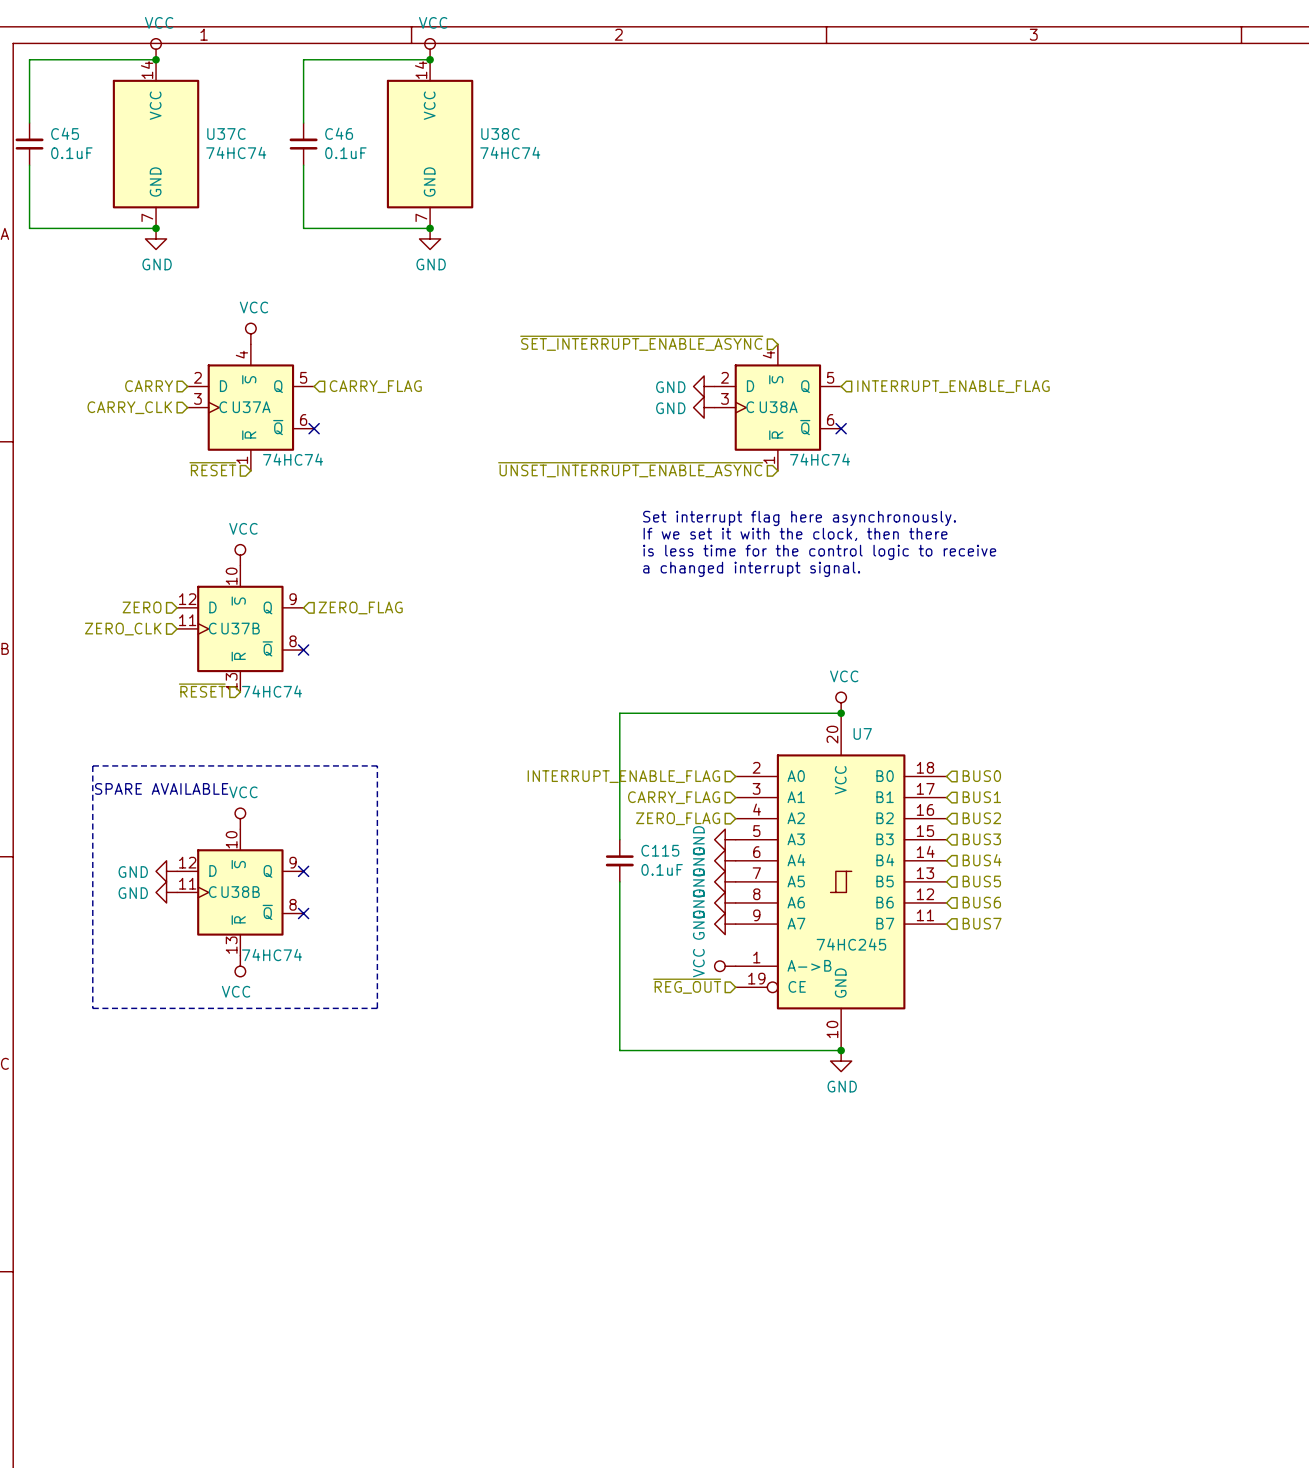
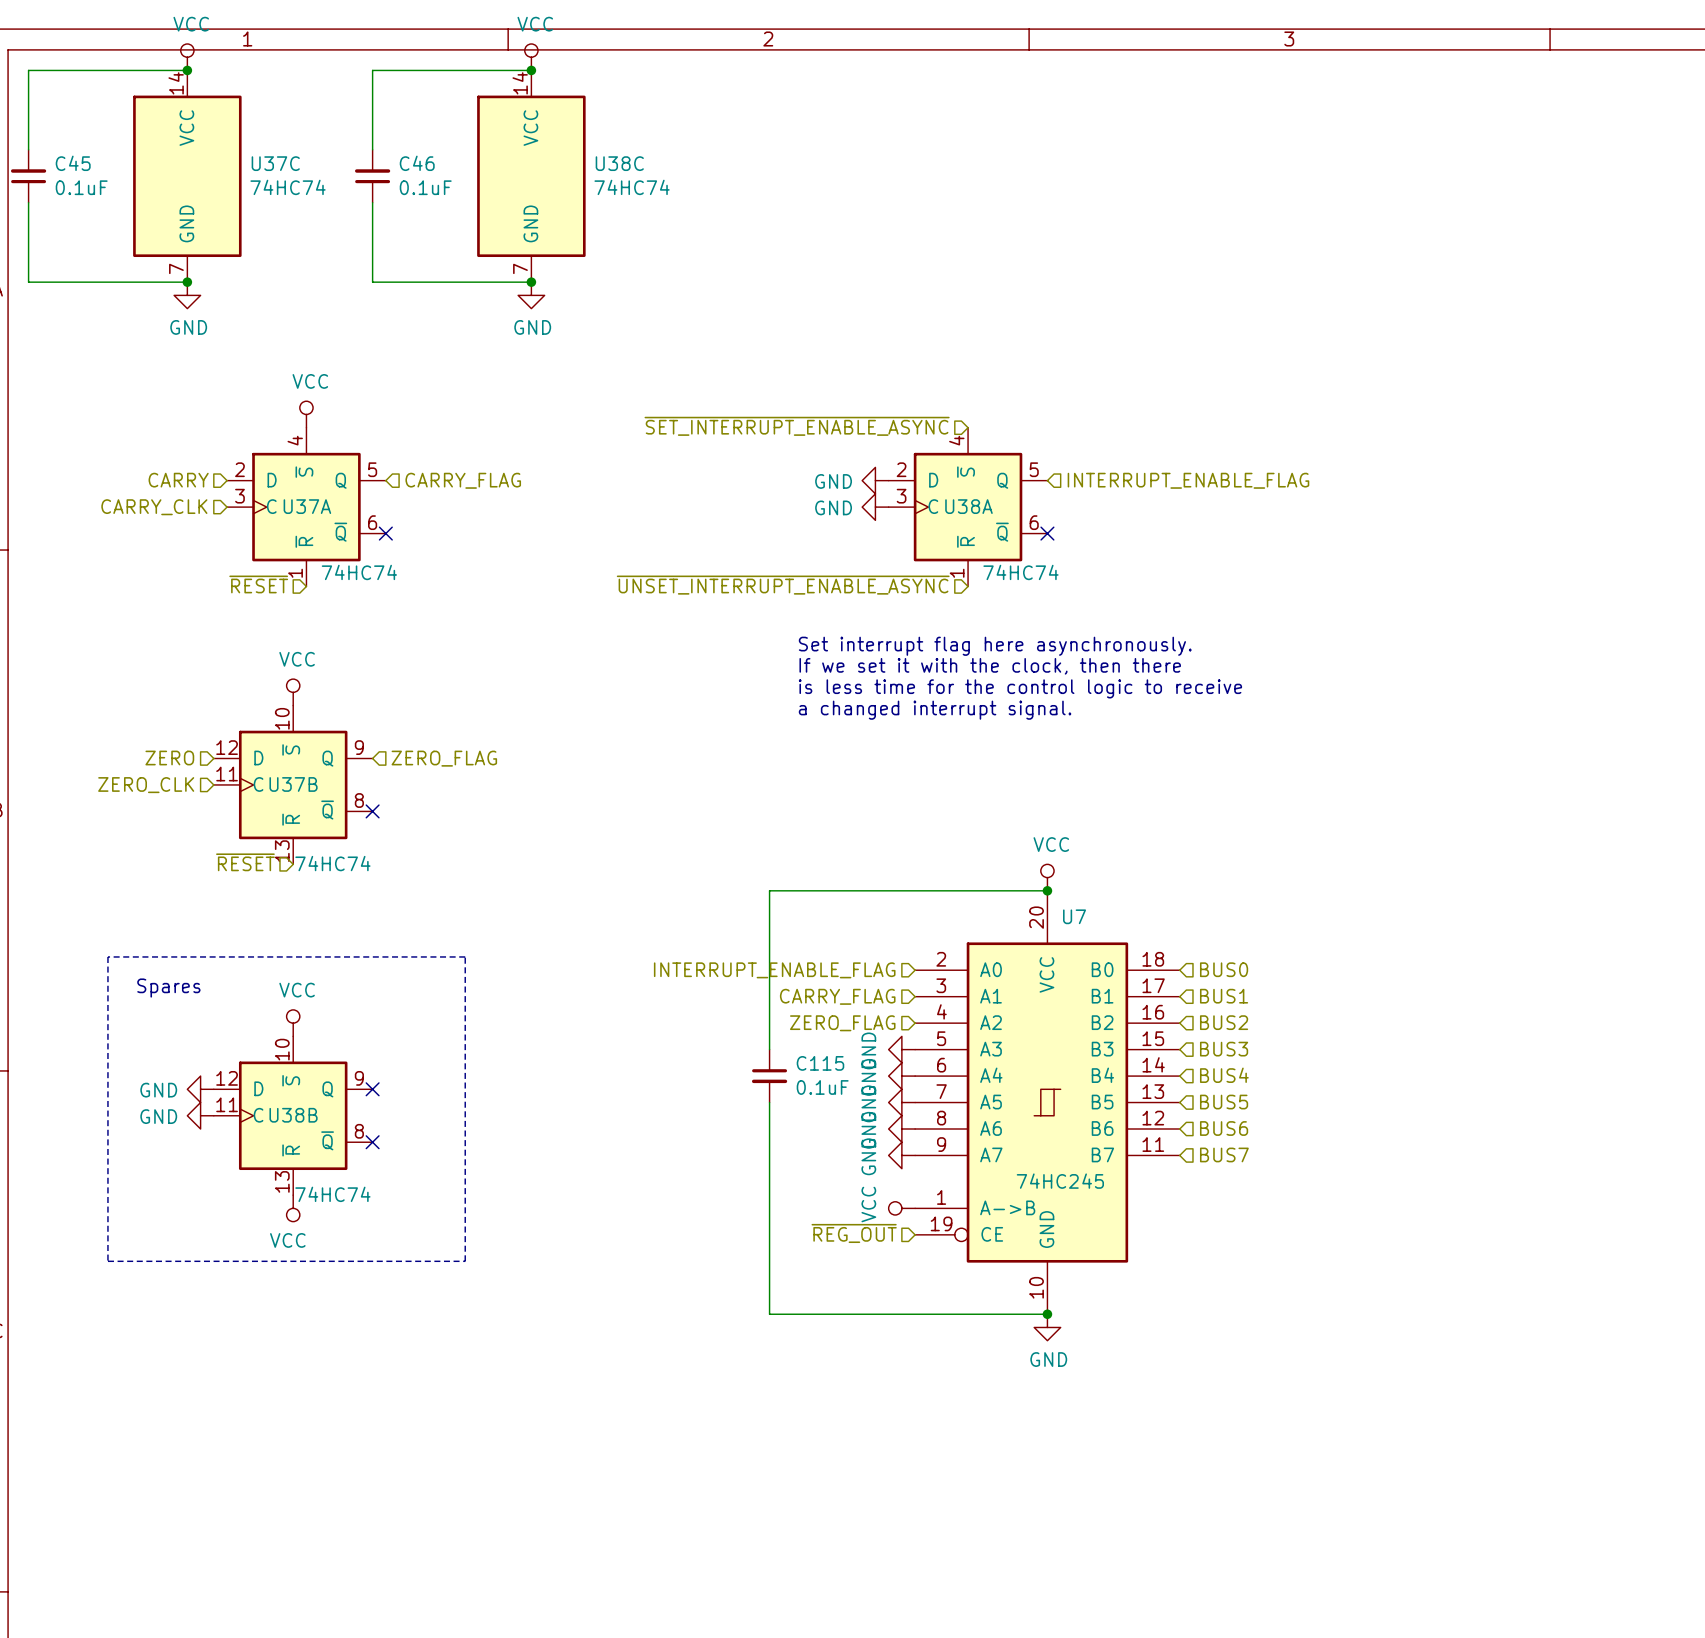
text: SPARE AVAILABLE (161, 788) -> none
text: none -> Spares (168, 988)

